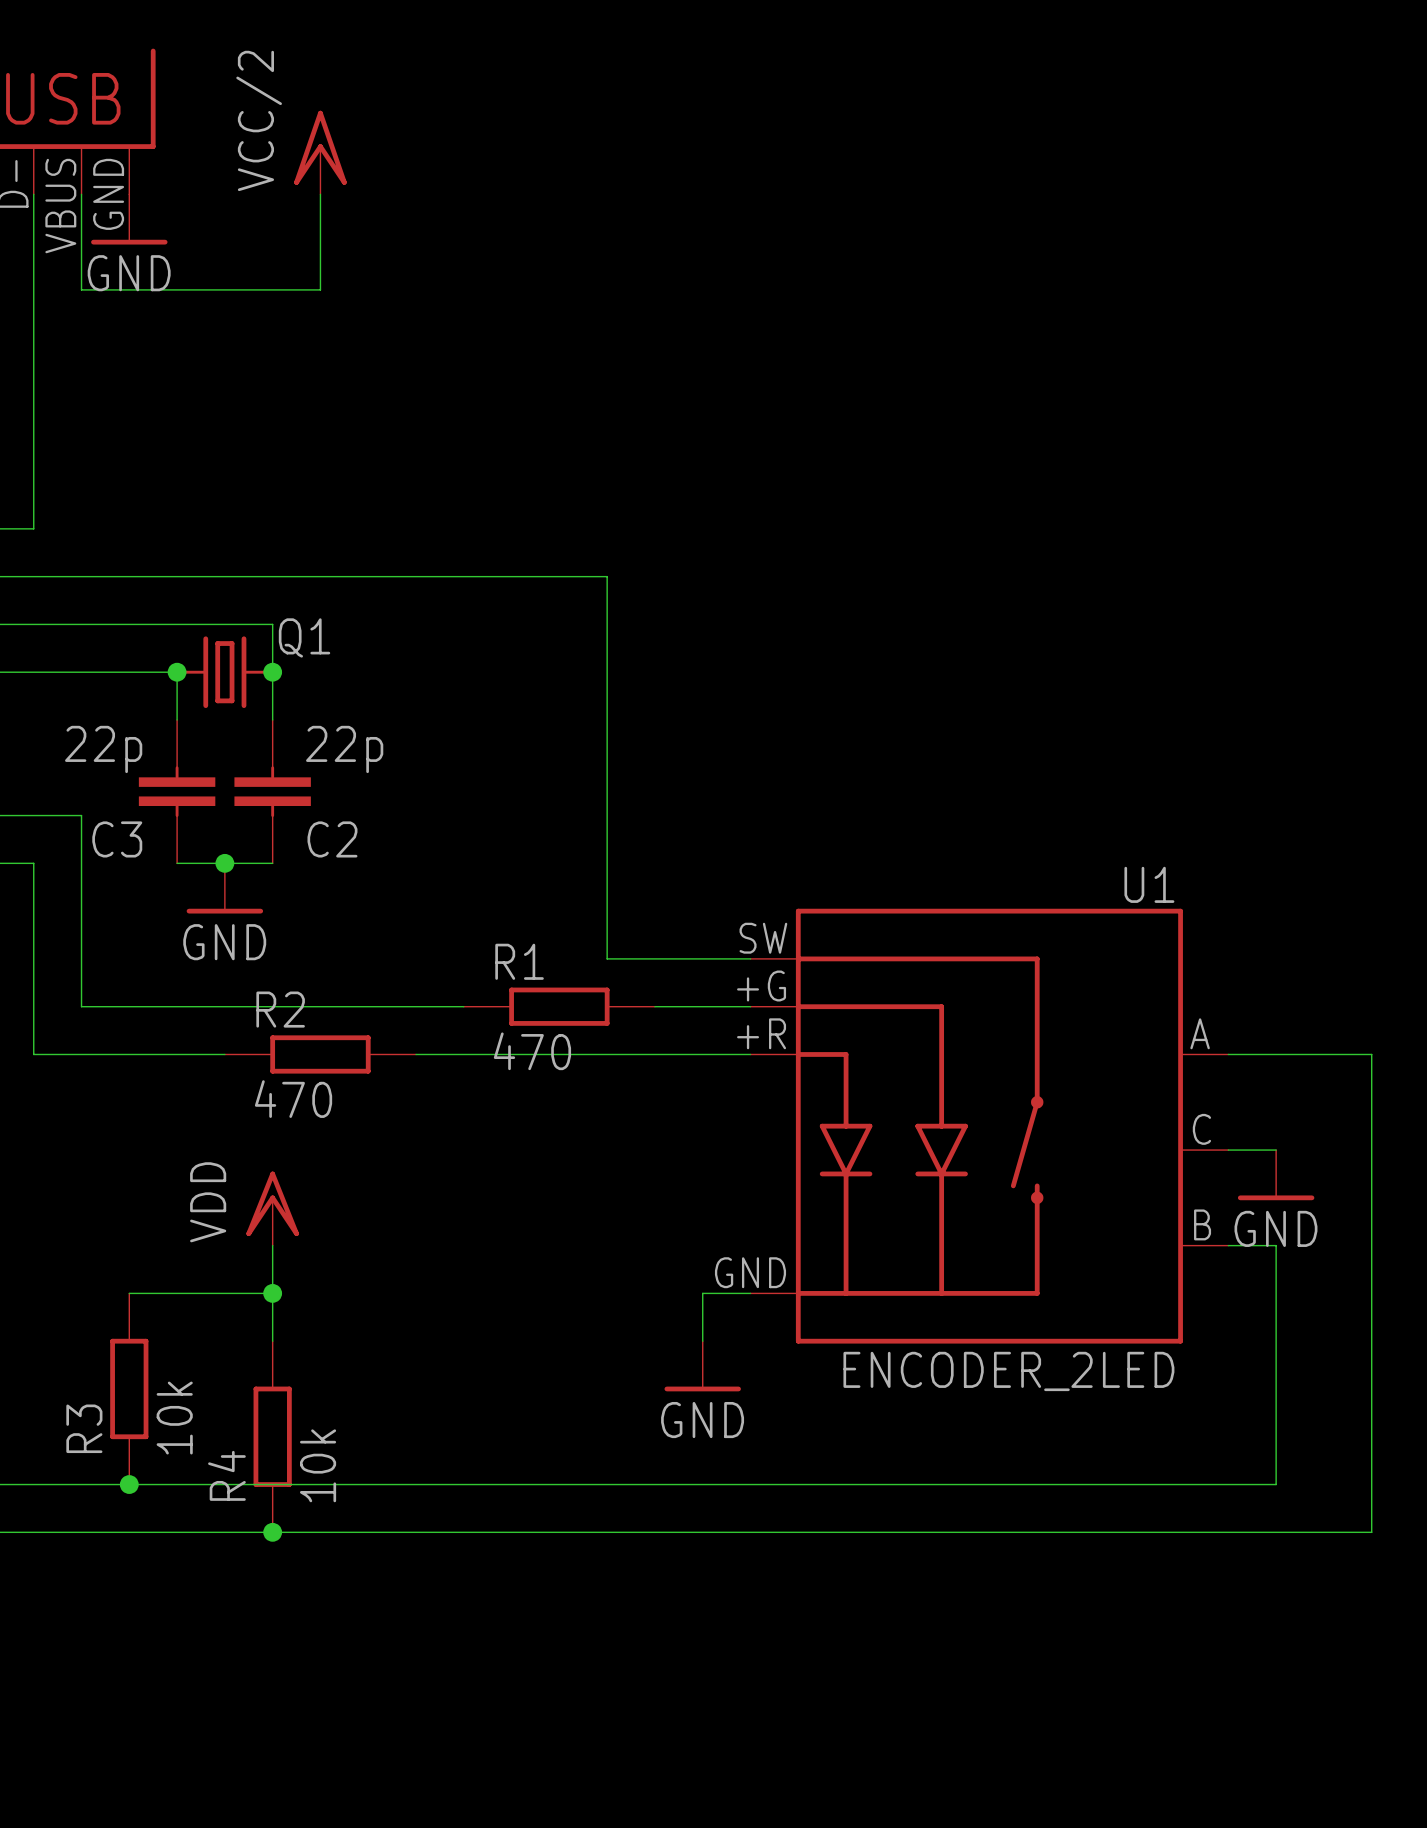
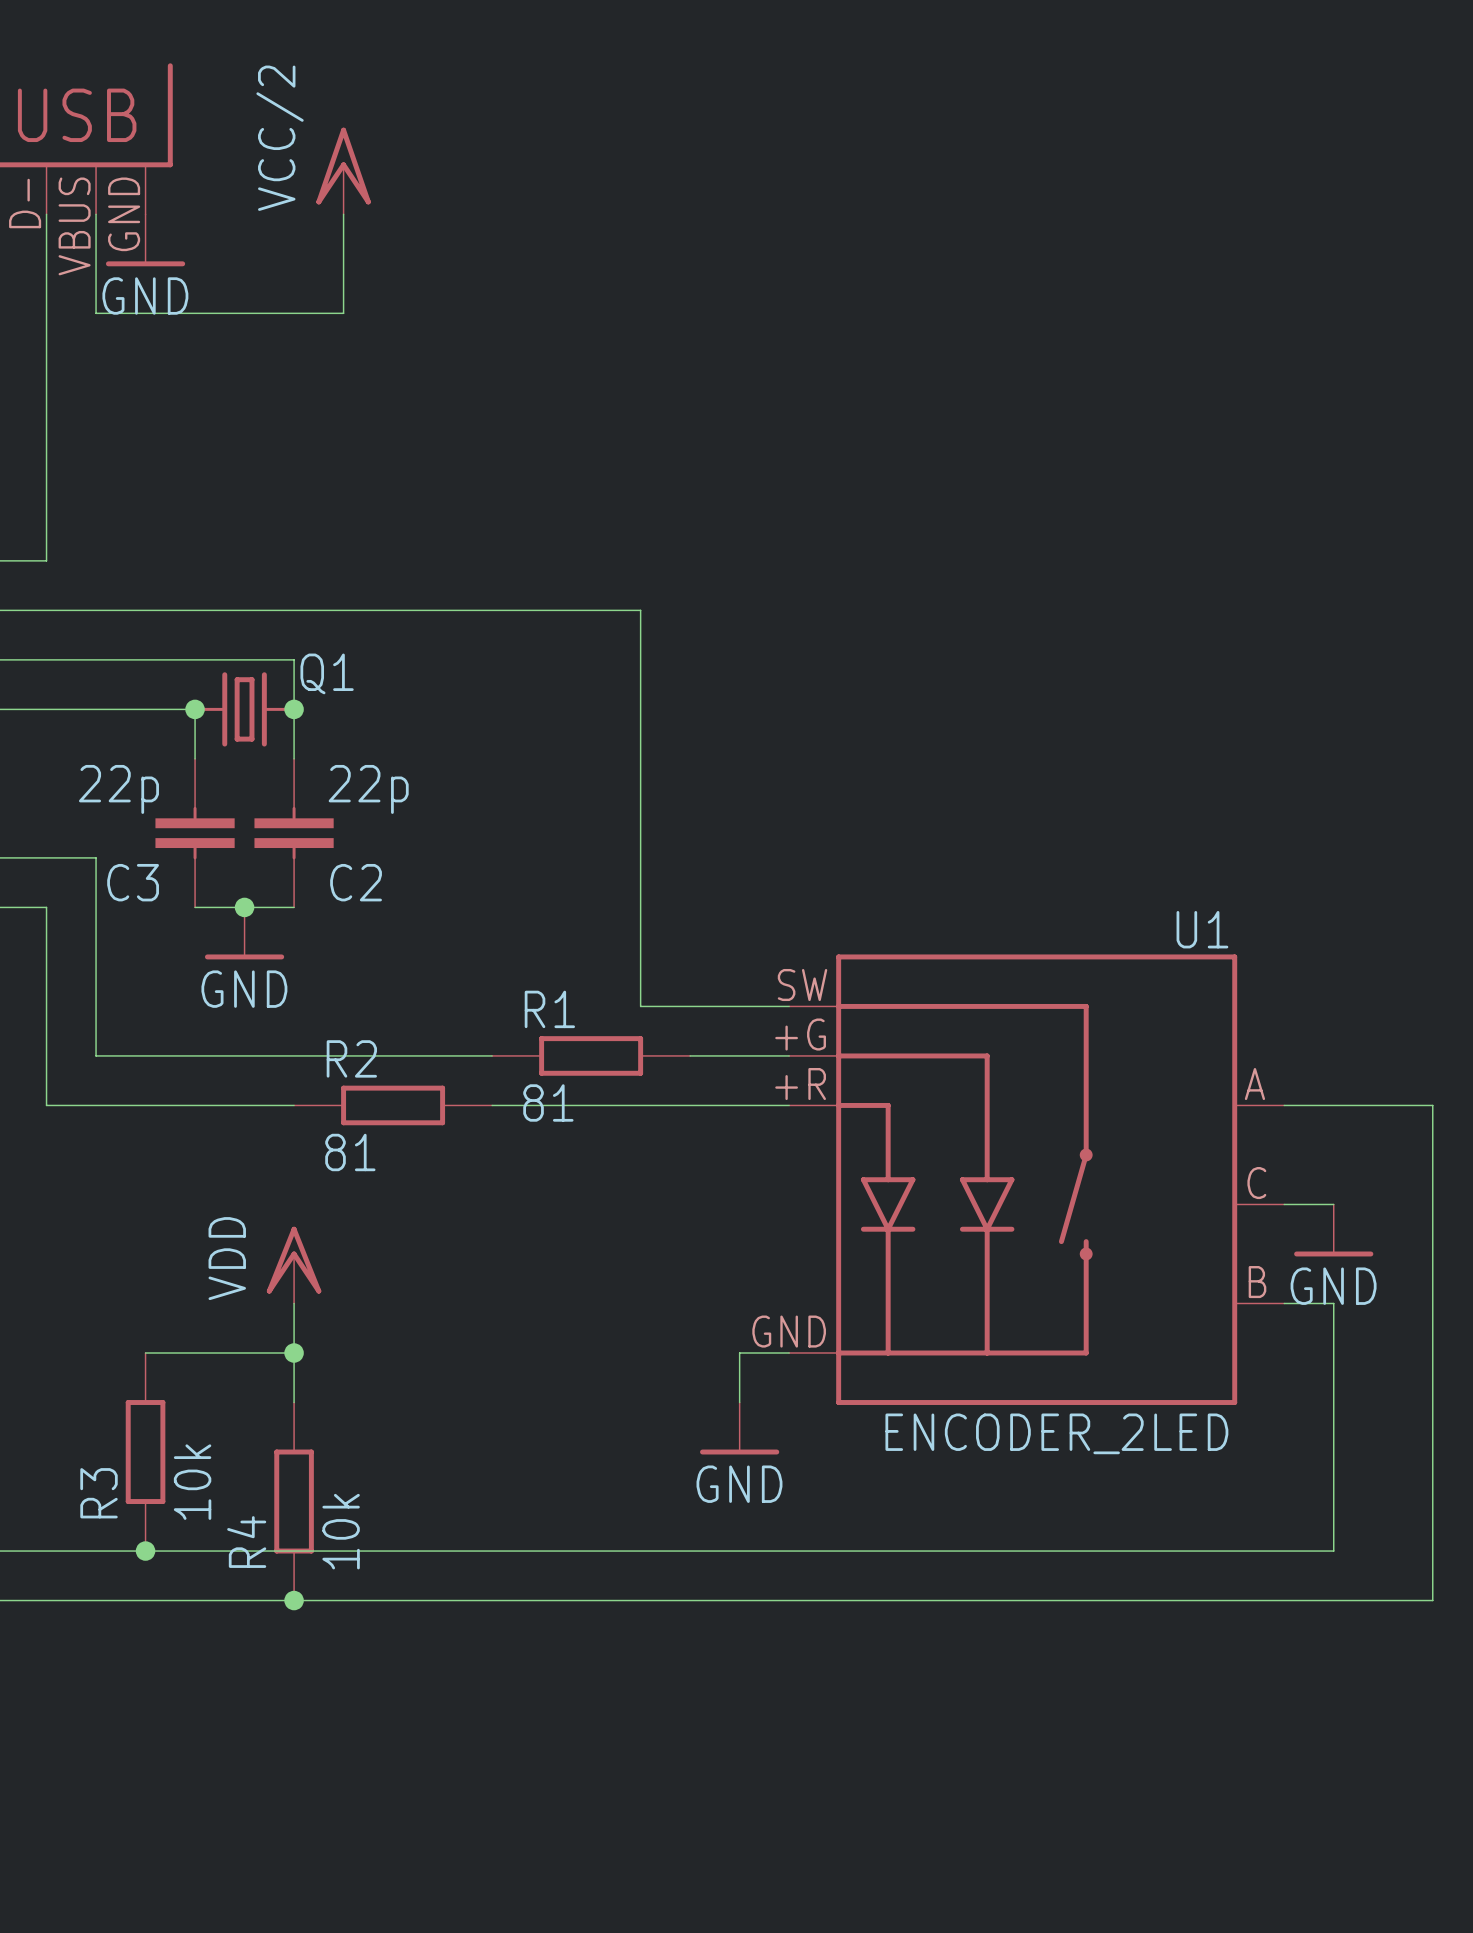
R1 value: 470 (532, 1051) -> 81 (548, 1102)
R2 position: (320, 1054) -> (393, 1105)
R2 value: 470 (293, 1099) -> 81 (350, 1152)

